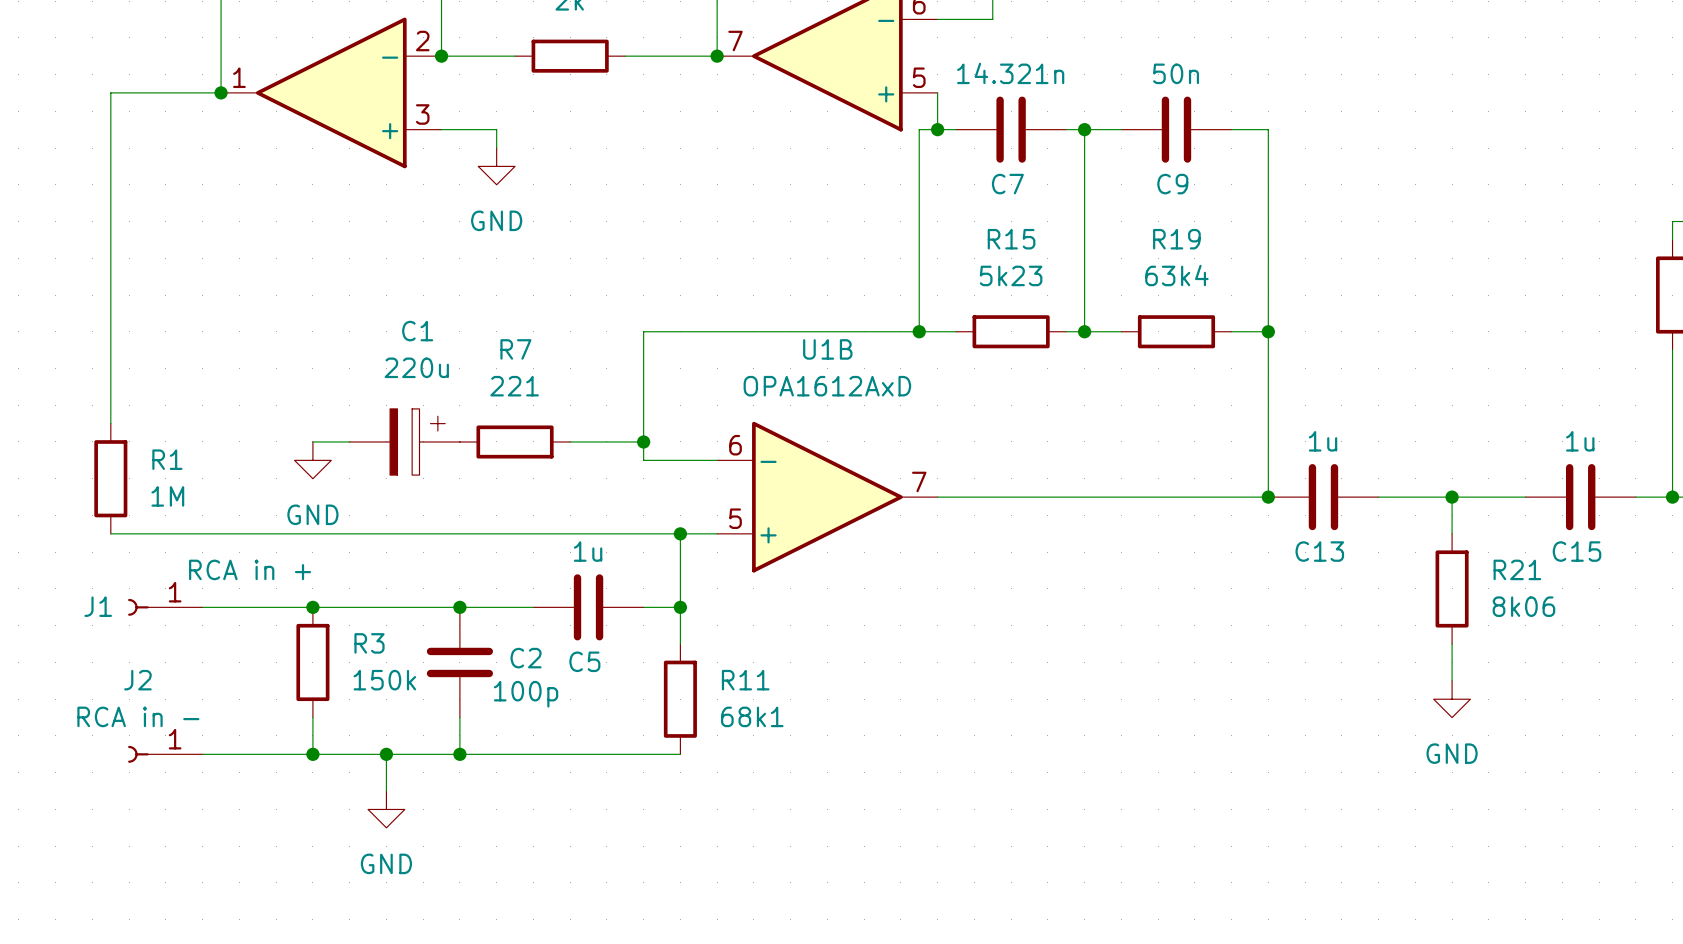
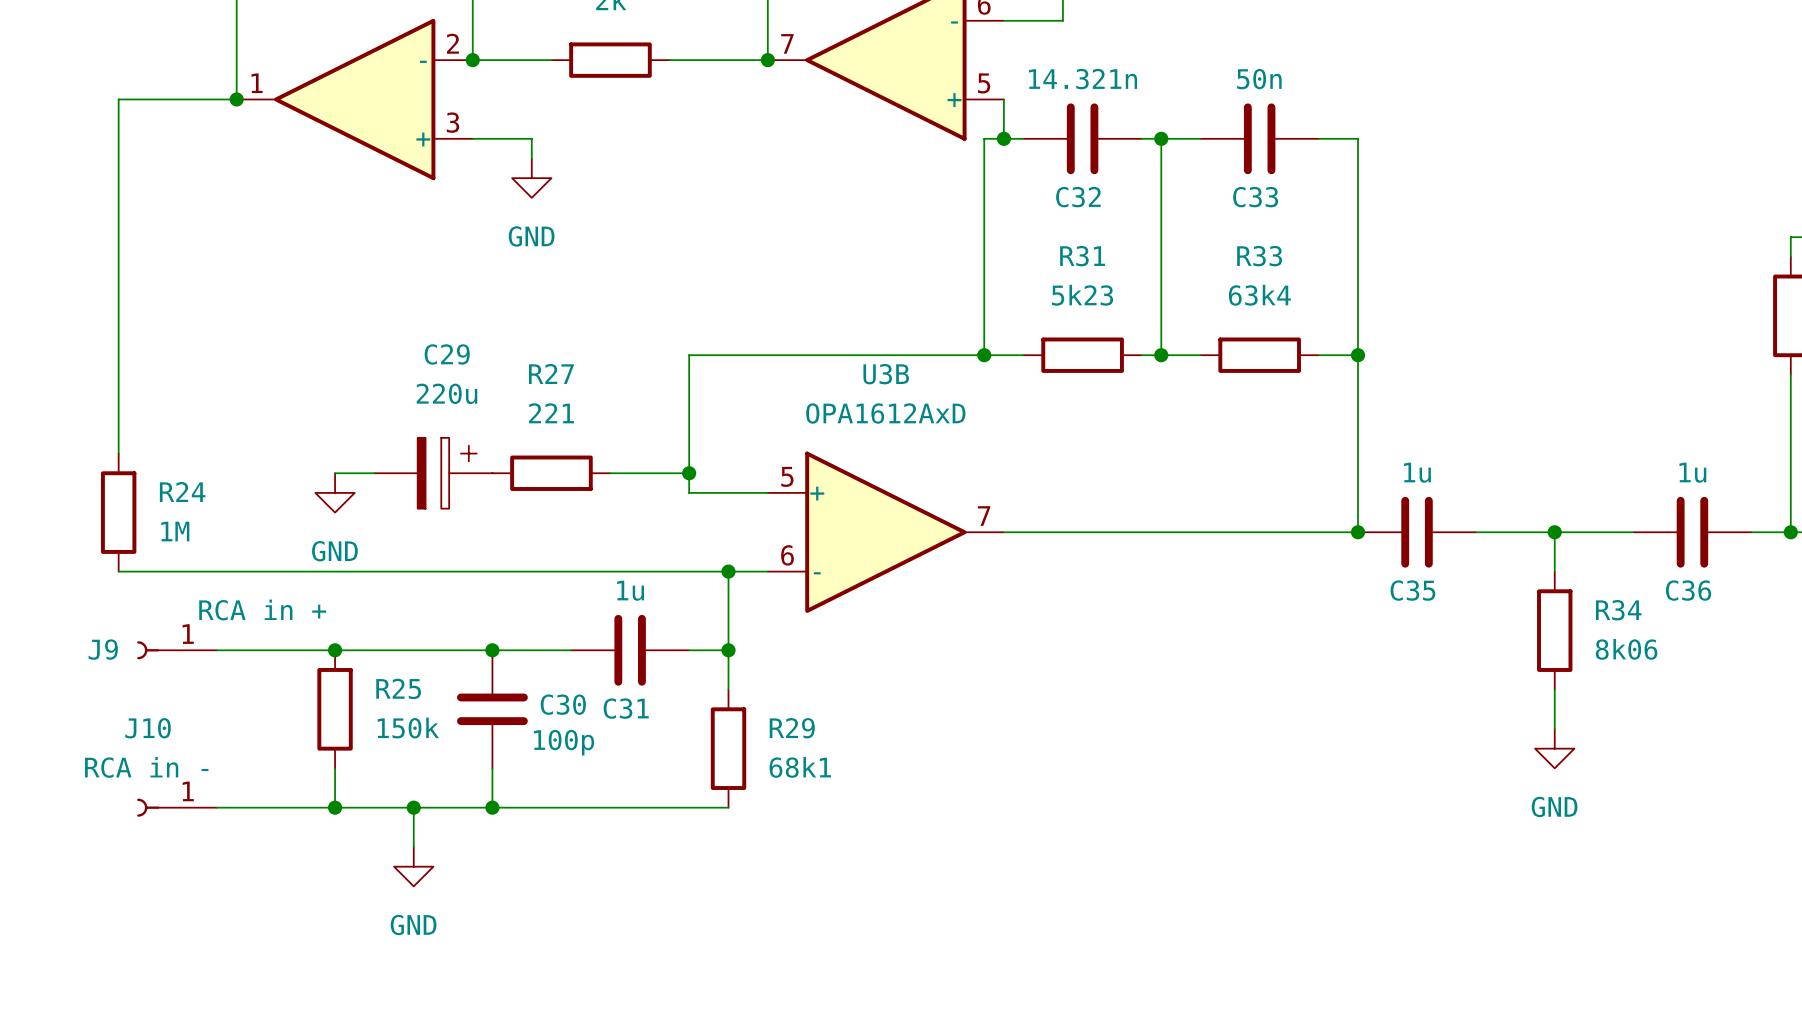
C7 name: C7 (1007, 184) -> C32 (1078, 197)
C9 name: C9 (1172, 184) -> C33 (1255, 197)
R15 name: R15 (1011, 239) -> R31 (1082, 256)
R19 name: R19 (1176, 239) -> R33 (1259, 256)
C1 name: C1 (417, 331) -> C29 (447, 354)
R7 name: R7 (515, 349) -> R27 (551, 373)
U1B name: U1B (827, 349) -> U3B (886, 374)
R1 name: R1 (167, 459) -> R24 (182, 492)
U1B flip: as is (827, 497) -> up-down (885, 532)
C13 name: C13 (1319, 551) -> C35 (1412, 590)
C15 name: C15 (1577, 551) -> C36 (1688, 590)
R21 name: R21 (1517, 569) -> R34 (1618, 610)
J1 name: J1 (98, 606) -> J9 (103, 649)
R3 name: R3 (369, 643) -> R25 (398, 688)
C2 name: C2 (526, 658) -> C30 (563, 704)
C5 name: C5 (584, 661) -> C31 (626, 708)
J2 name: J2 (137, 680) -> J10 (148, 728)
R11 name: R11 (745, 680) -> R29 (792, 728)

